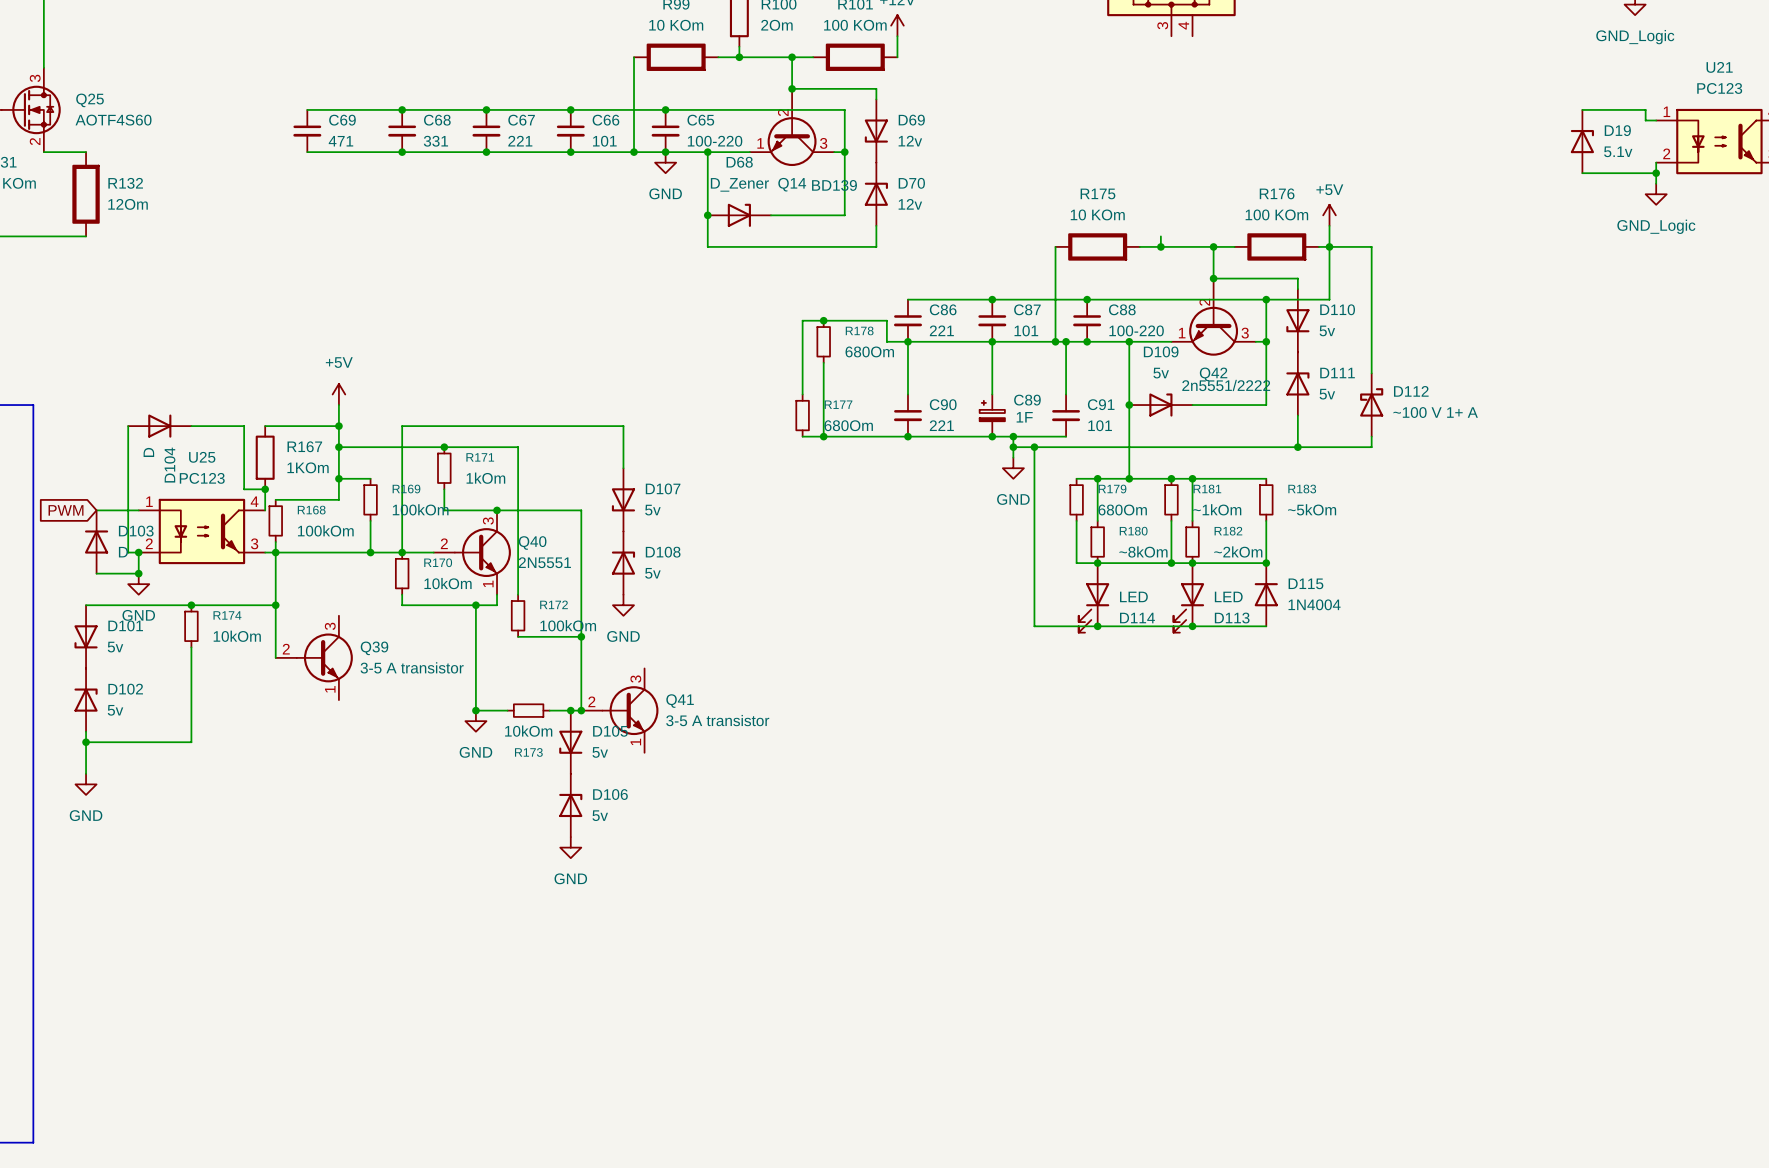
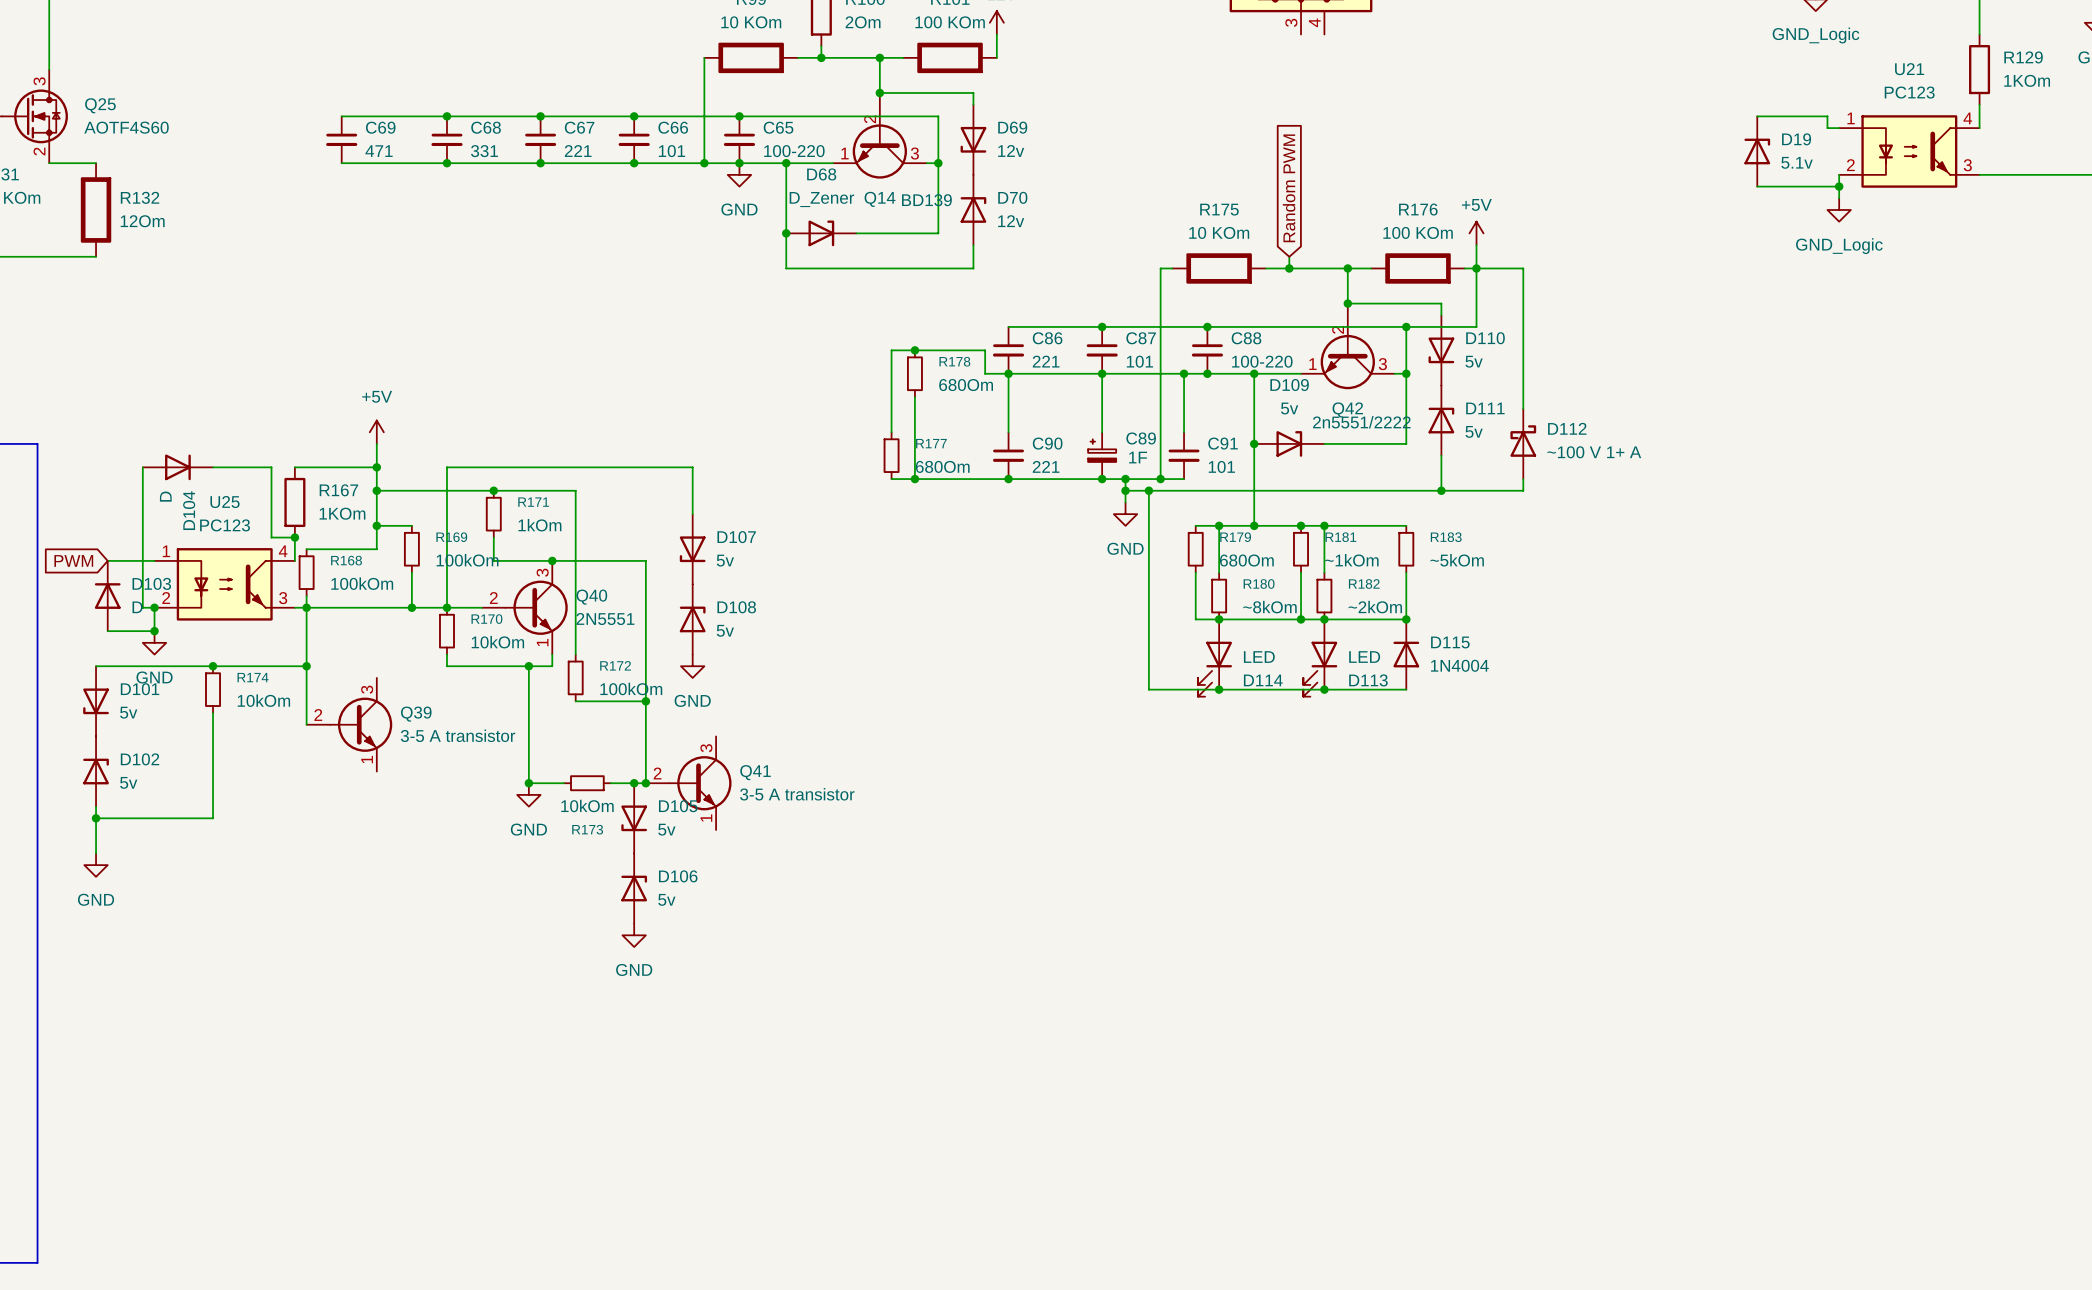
global label: none -> Random PWM (1289, 188)
wire: (1055, 246) (1055, 341) -> (1172, 268) (1160, 268) (1160, 479)
junction: (1055, 341) -> none
junction: none -> (1160, 479)

